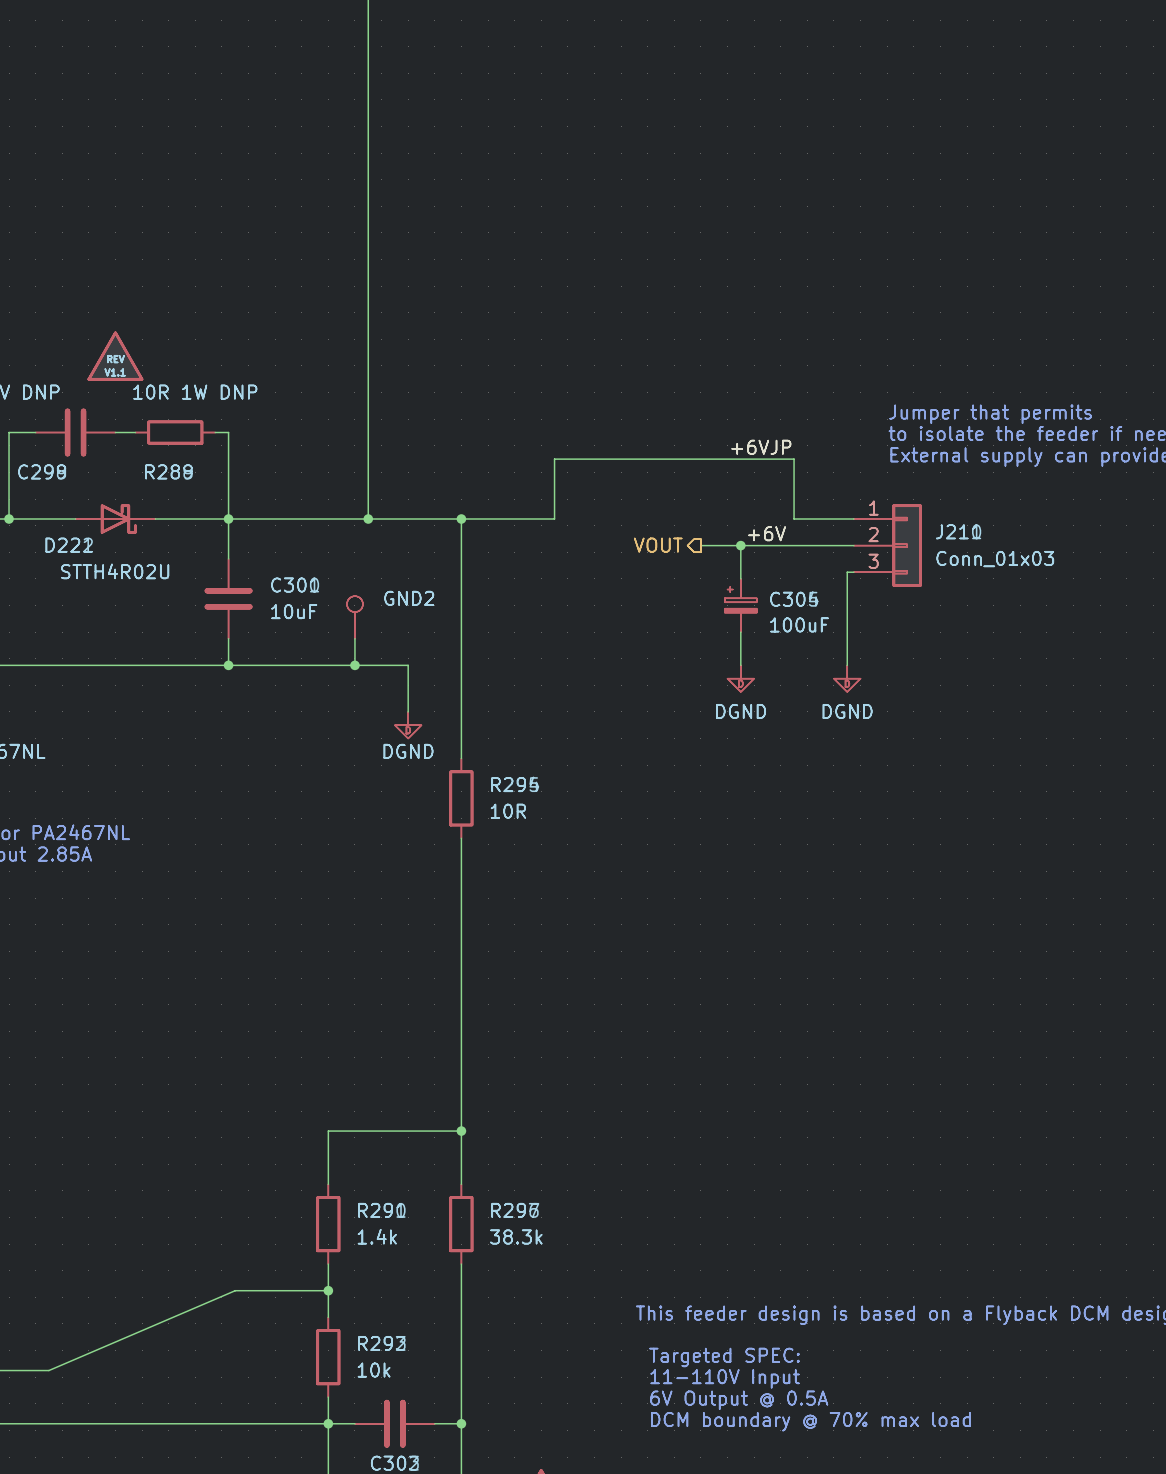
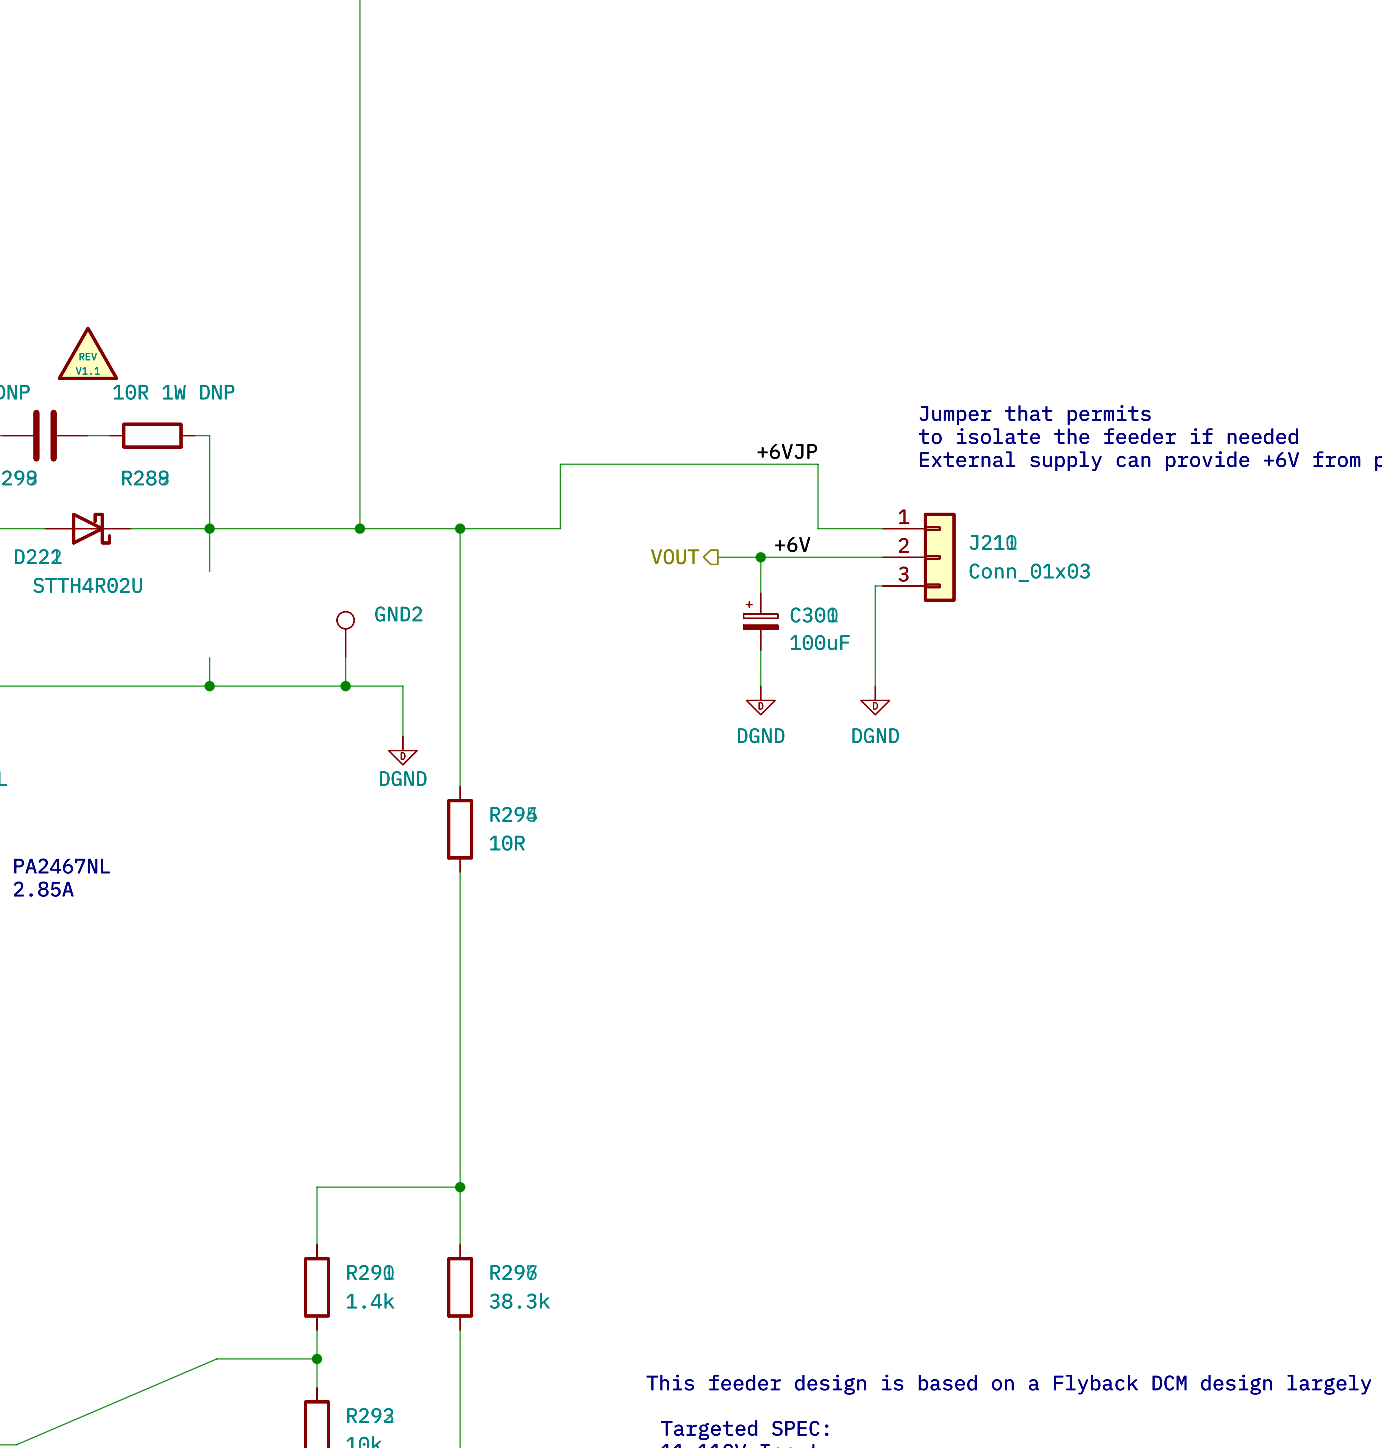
part symbol: [204, 558, 253, 639] -> [743, 593, 778, 651]
part symbol: [204, 558, 253, 639] -> [743, 593, 778, 651]
part: 100uF (740, 605) -> none
part: 100uF (740, 605) -> none
part value: 10uF (294, 611) -> 100uF (819, 642)
part value: 10uF (294, 611) -> 100uF (819, 642)

